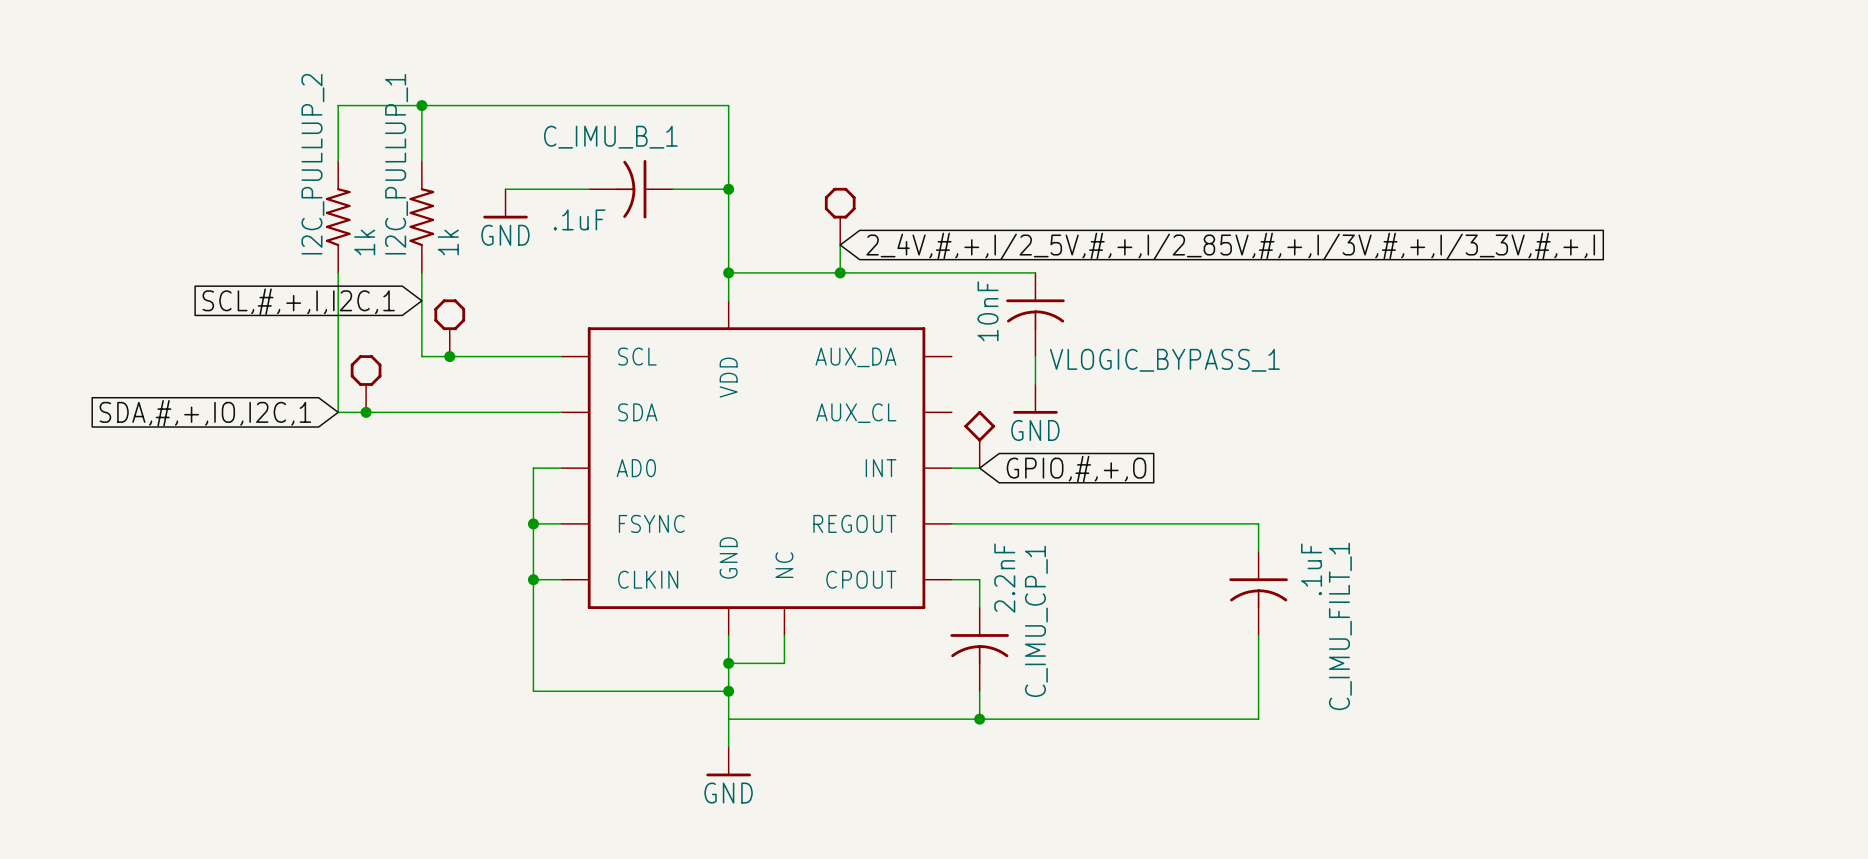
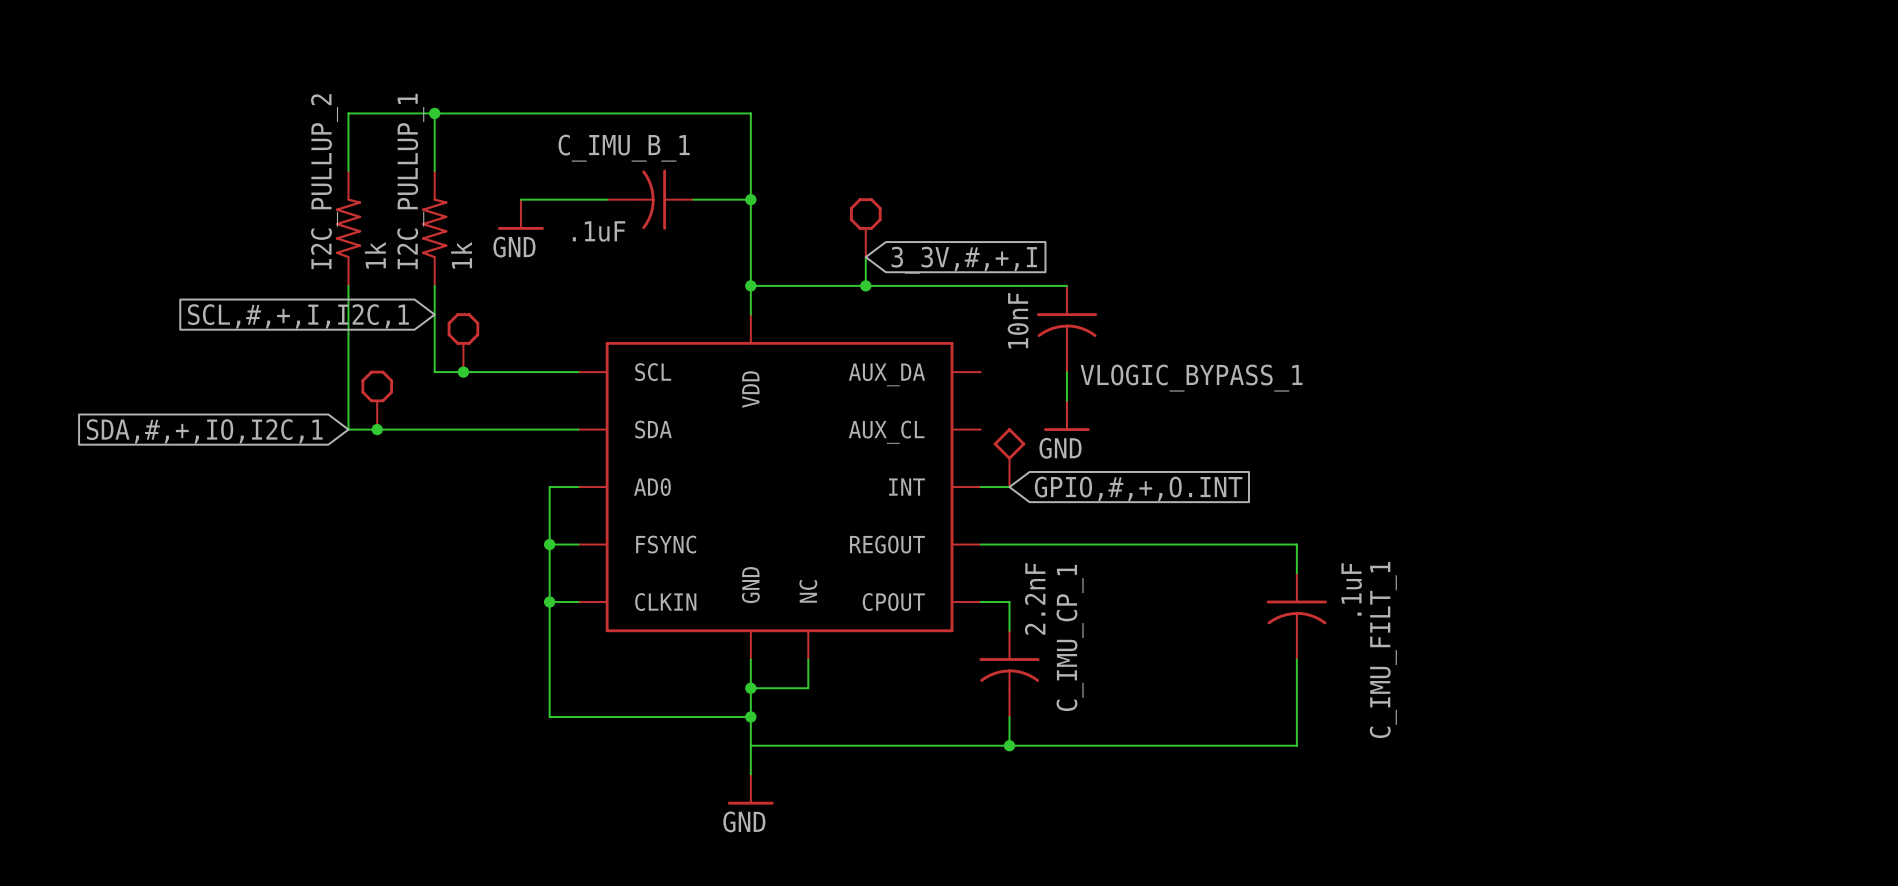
global label: 2_4V,#,+,I/2_5V,#,+,I/2_85V,#,+,I/3V,#,+,I/3_3V,#,+,I (1230, 246) -> 3_3V,#,+,I (964, 260)
global label: GPIO,#,+,O (1076, 469) -> GPIO,#,+,O.INT (1138, 488)

